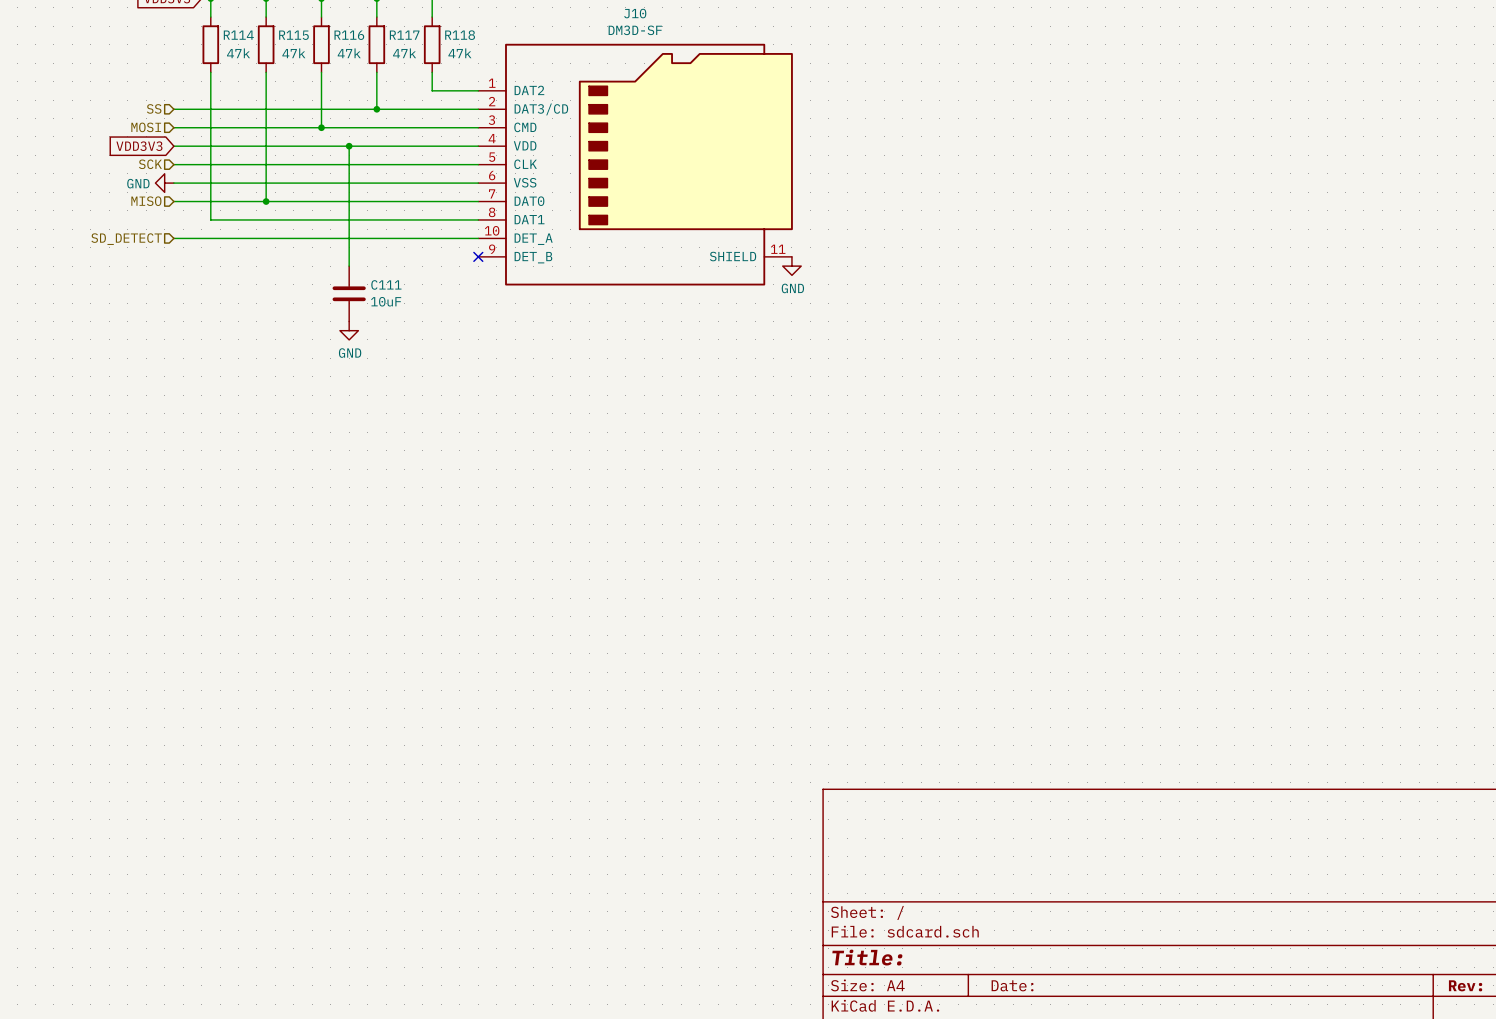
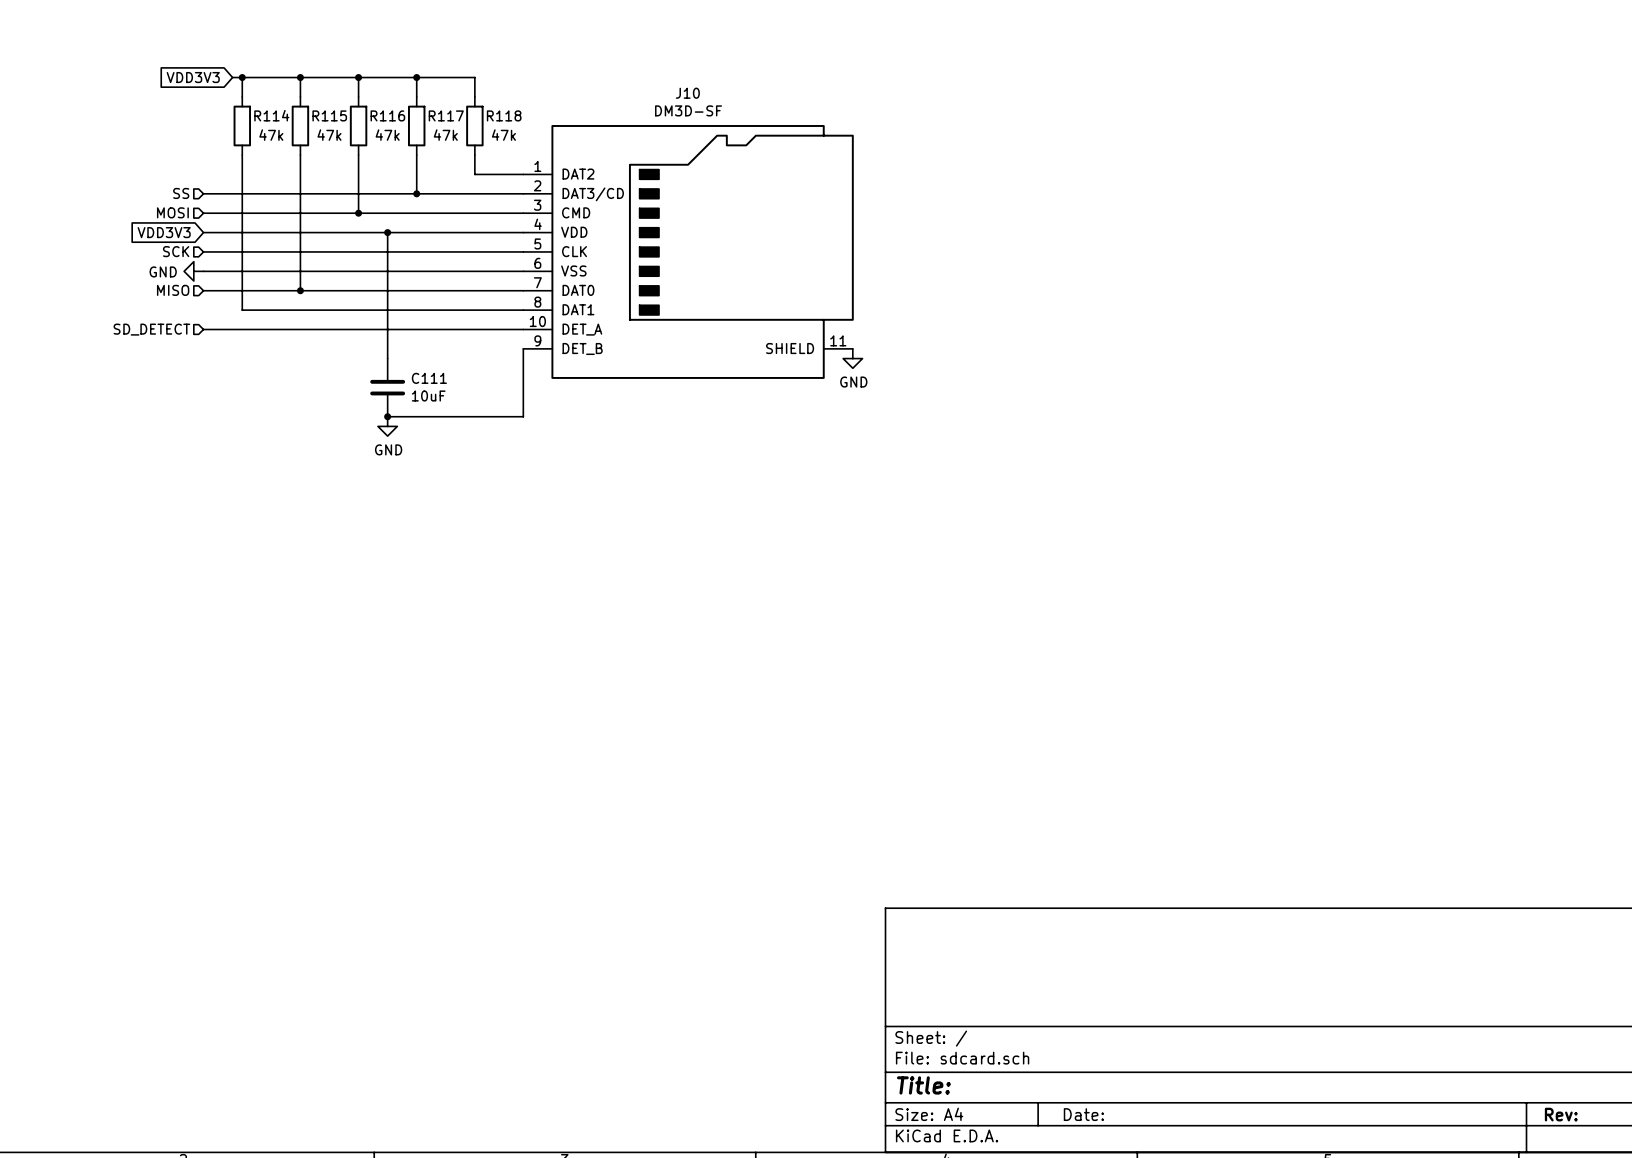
wire: none -> (523, 348) (523, 416) (387, 416)
no-connect mark: (478, 256) -> none
junction: none -> (387, 416)

